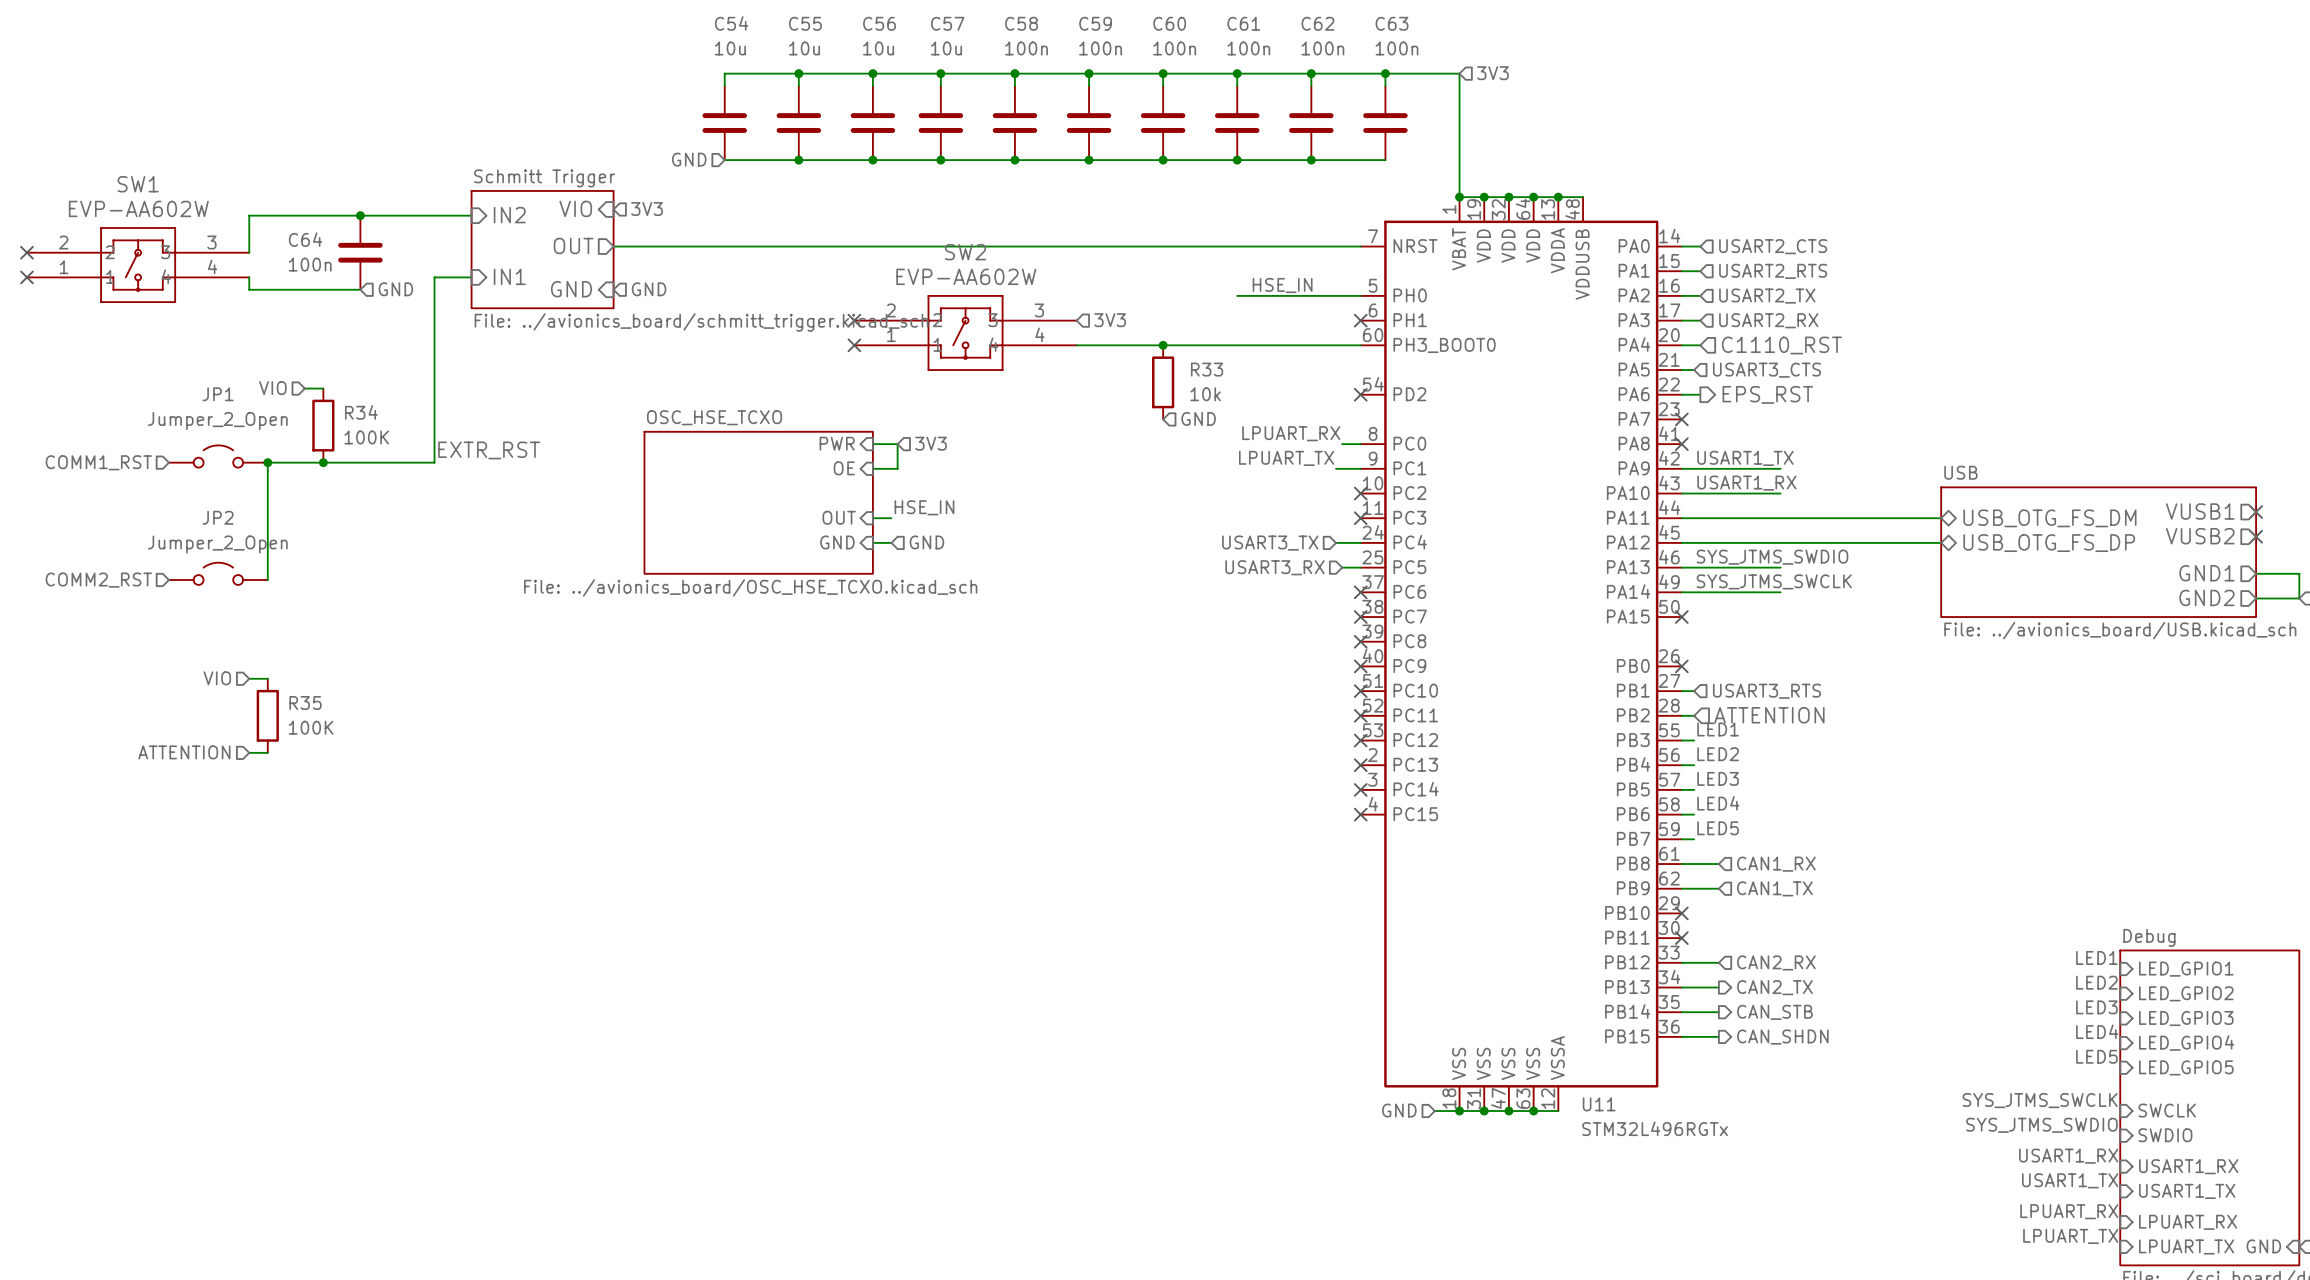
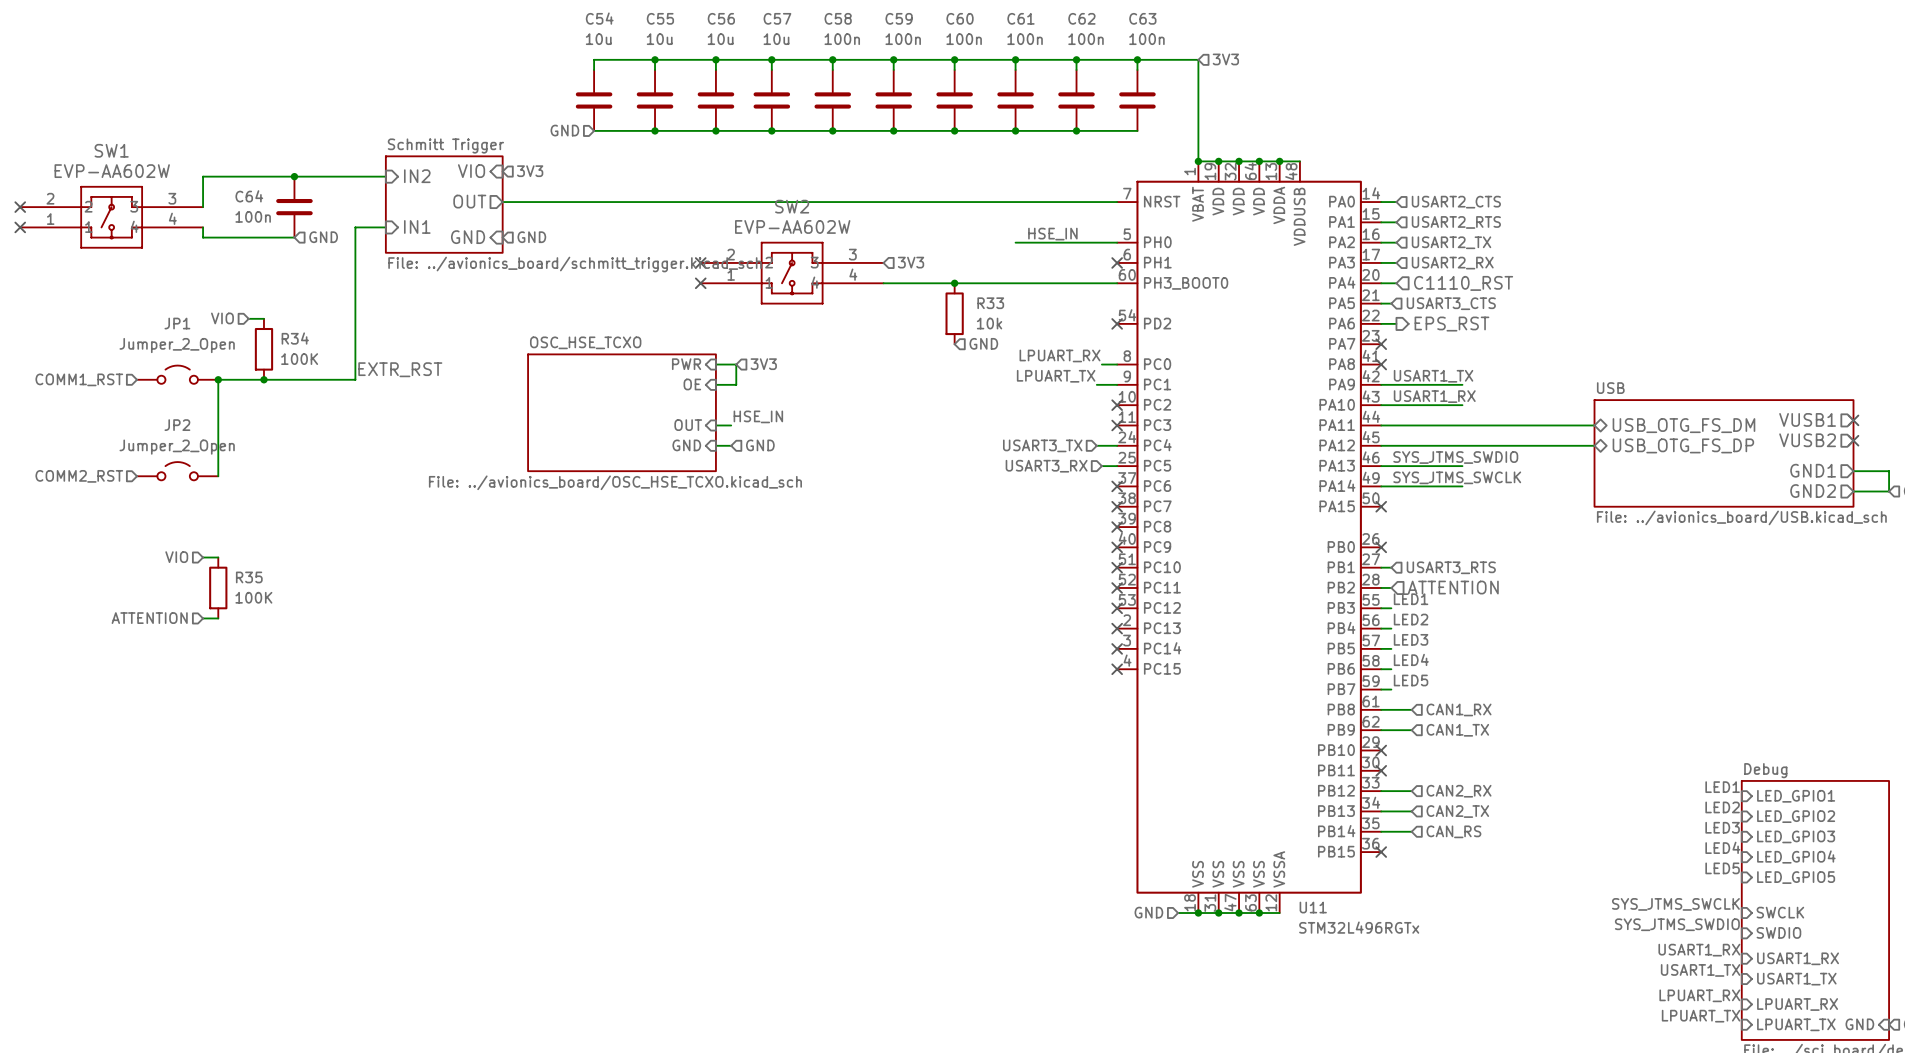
hierarchical label shape: output (1774, 987) -> input (1457, 811)
hierarchical label shape: output (1774, 1012) -> input (1453, 831)
hierarchical label: CAN_STB (1774, 1012) -> CAN_RS (1453, 831)
wire: (1681, 1036) (1718, 1036) -> none
no-connect mark: none -> (1381, 852)
hierarchical label: CAN_SHDN (1782, 1037) -> none

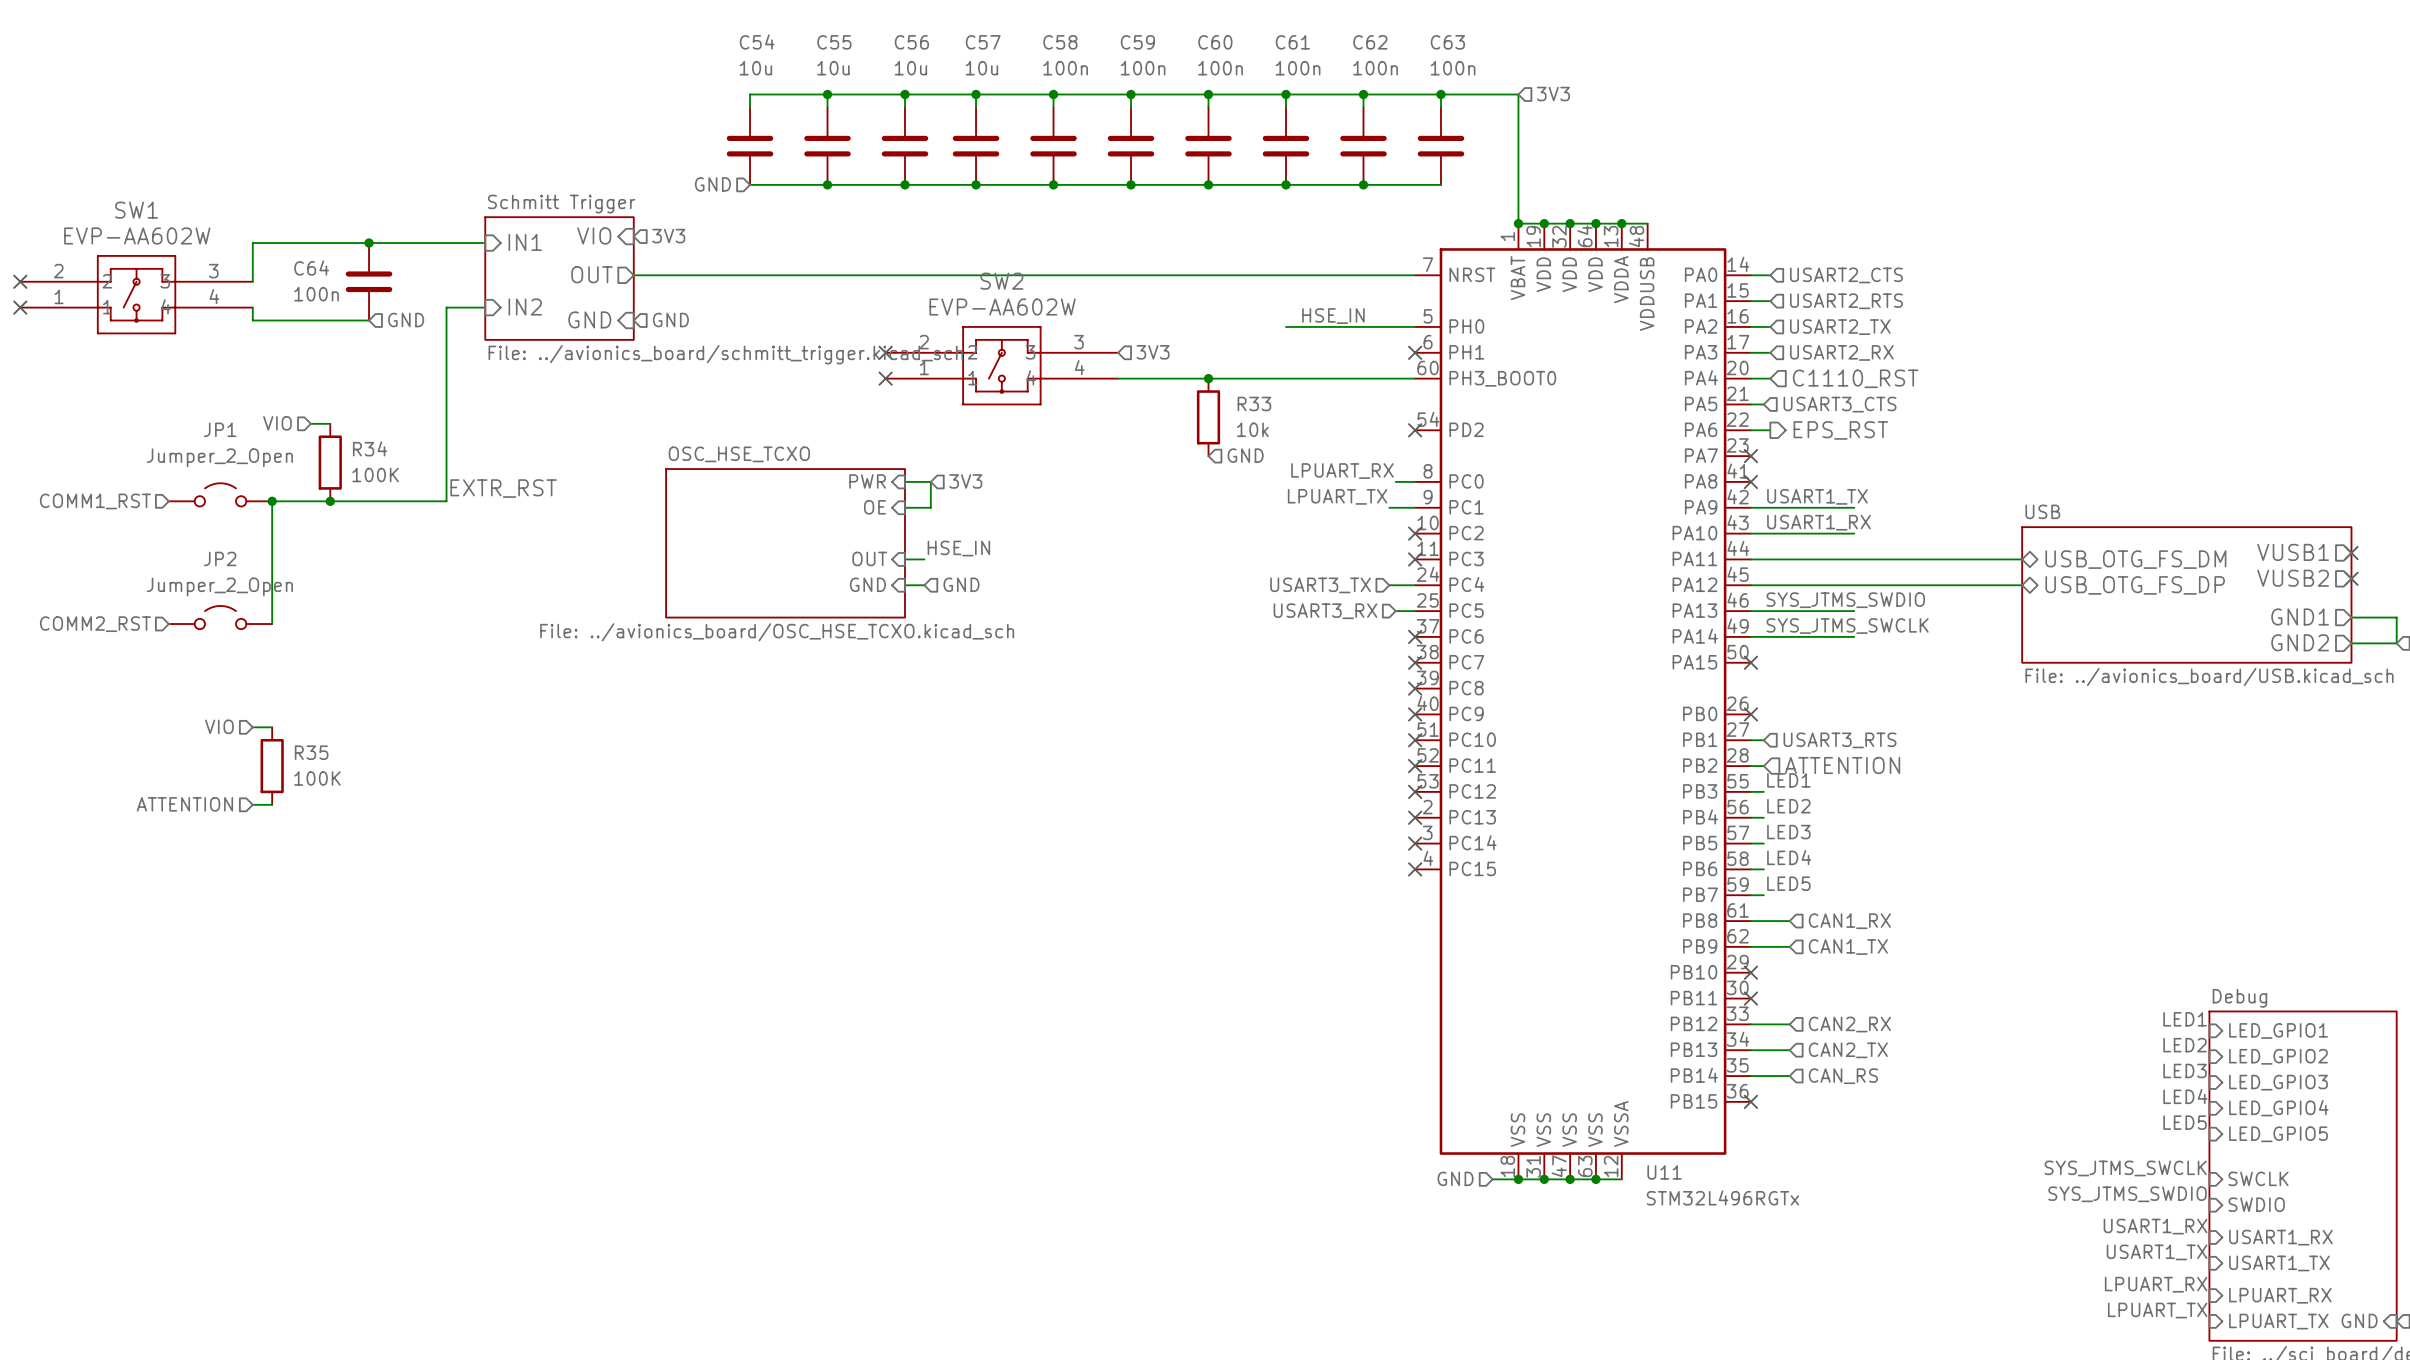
sheet pin: IN2 (417, 176) -> IN1 (525, 242)
sheet pin: IN1 (417, 226) -> IN2 (525, 307)

